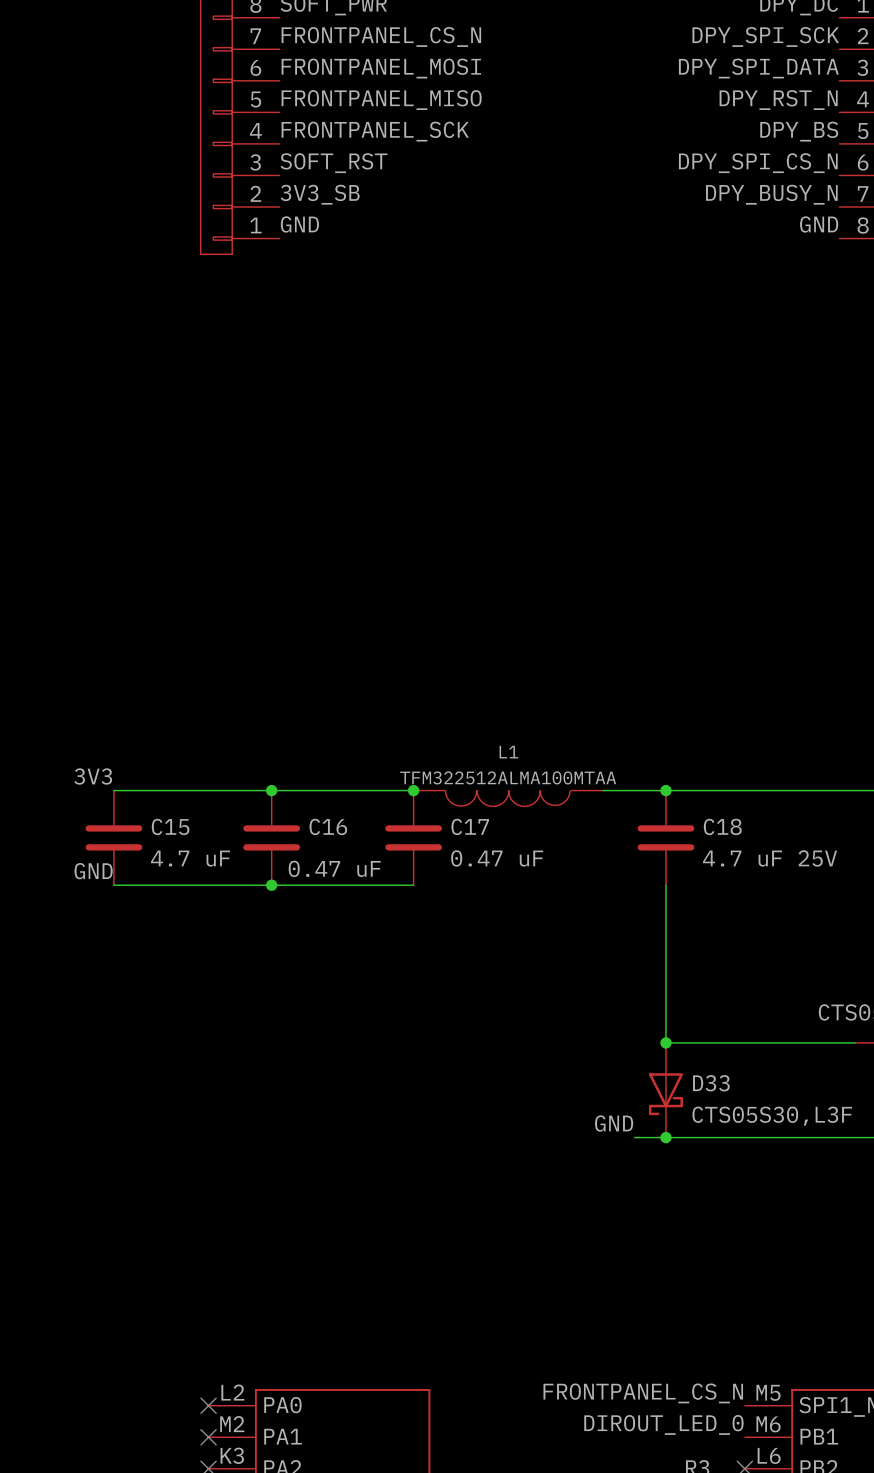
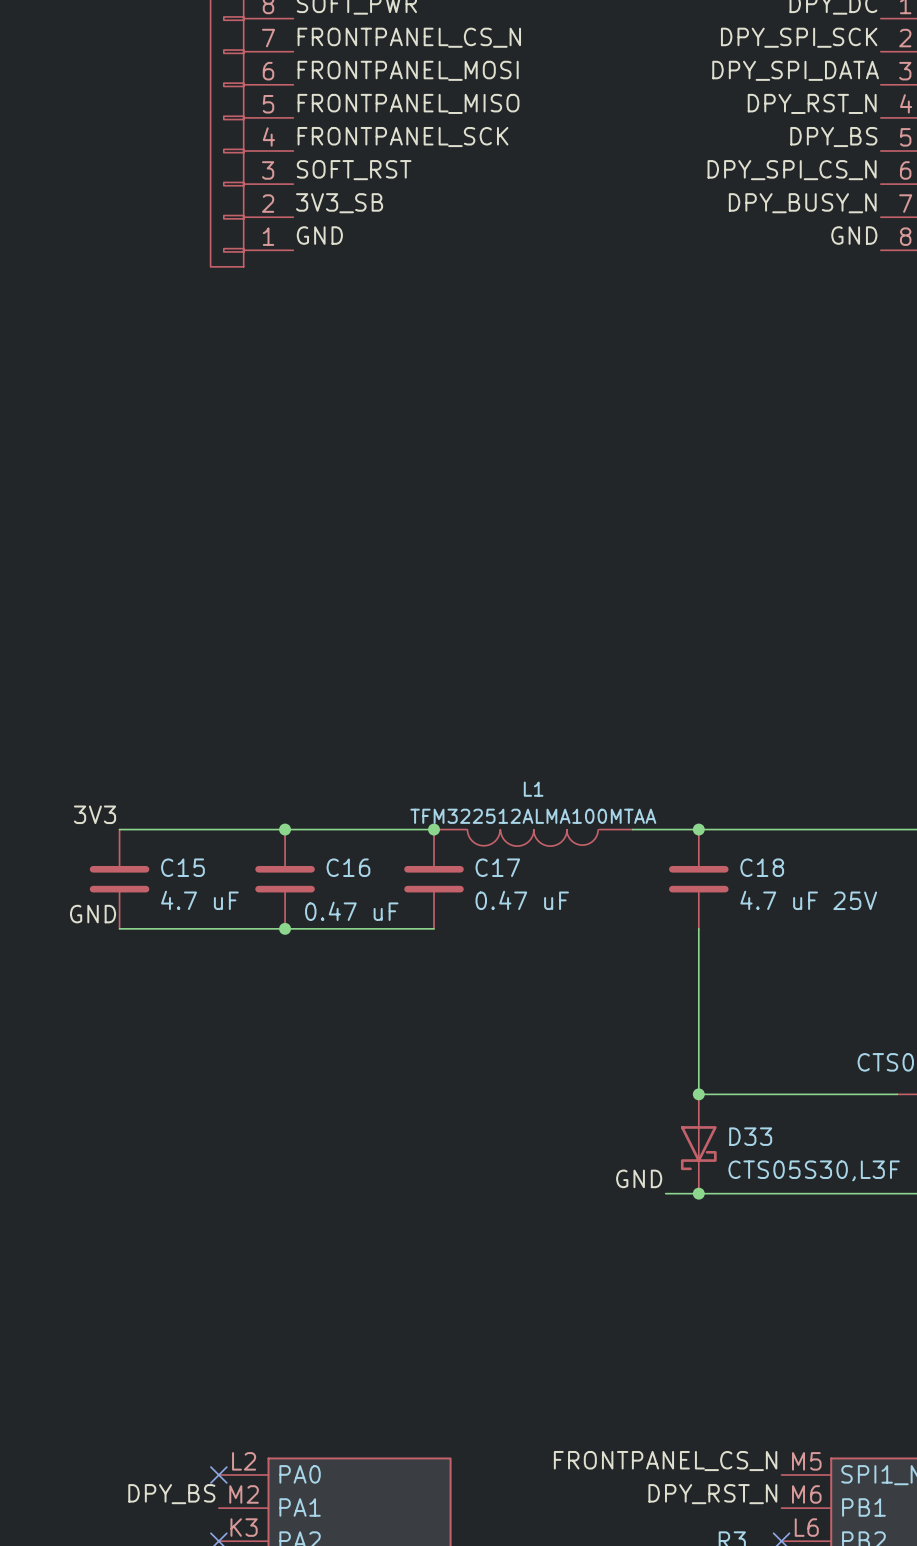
label: none -> DPY_BS (171, 1494)
label: DIROUT_LED_0 (663, 1424) -> DPY_RST_N (712, 1494)
no-connect mark: (208, 1437) -> none

